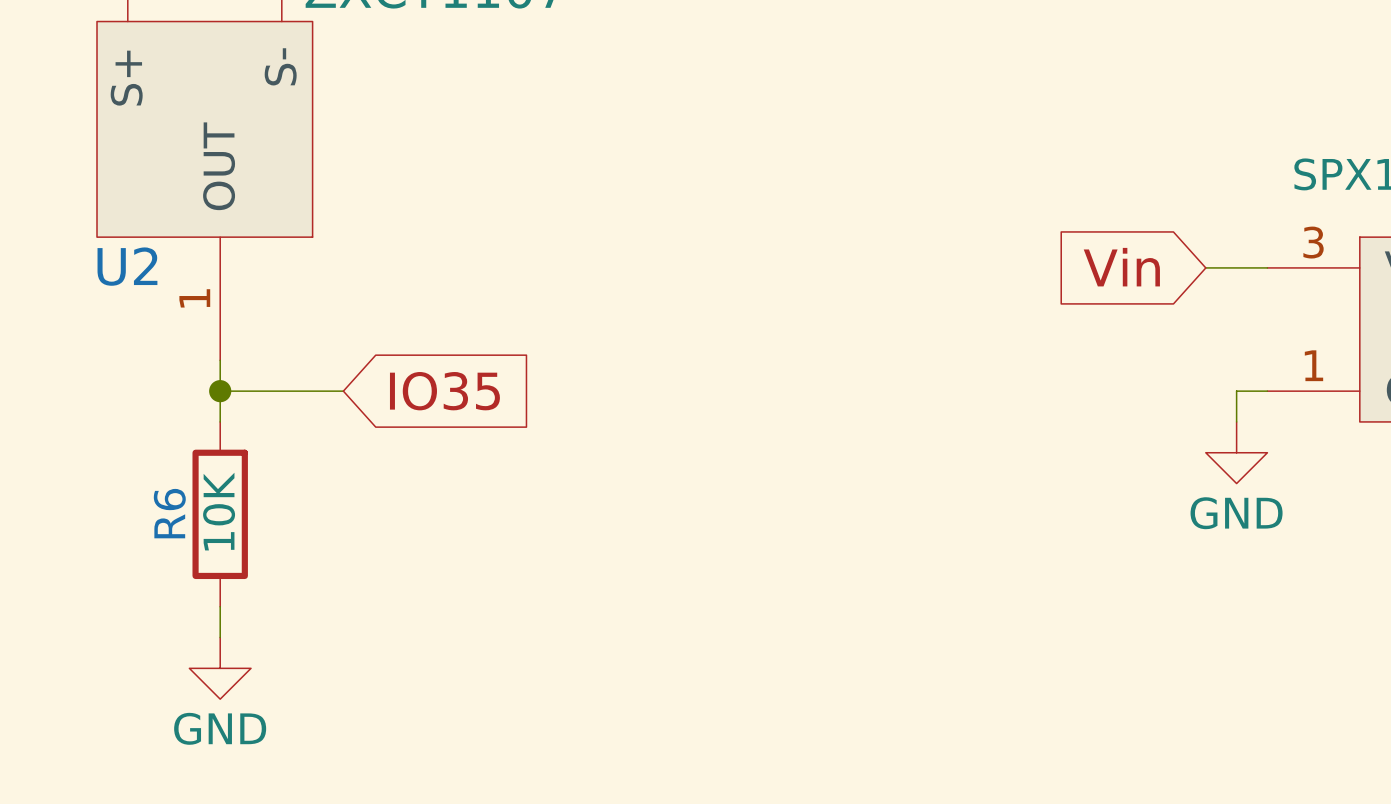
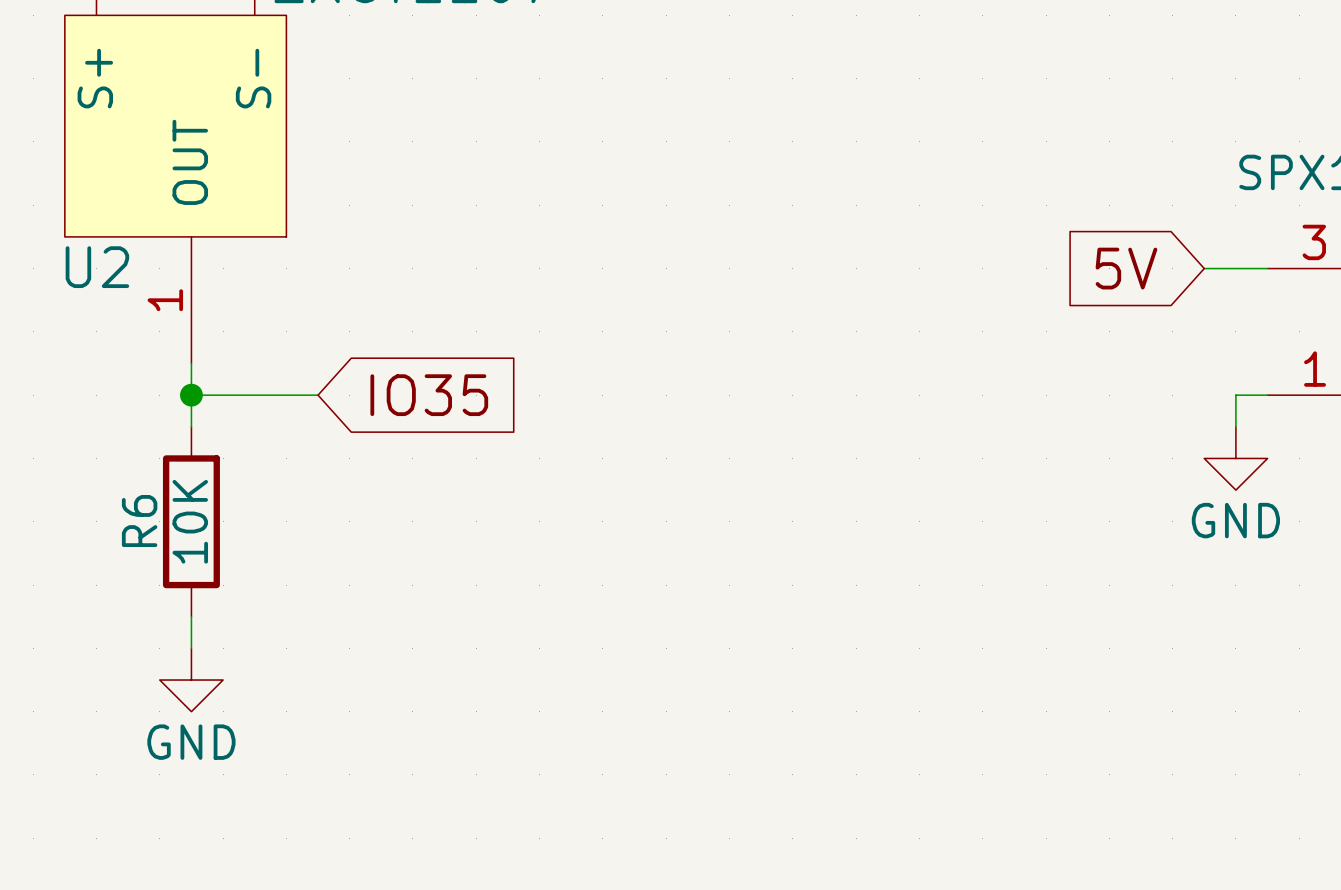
global label: Vin (1121, 267) -> 5V (1126, 268)

